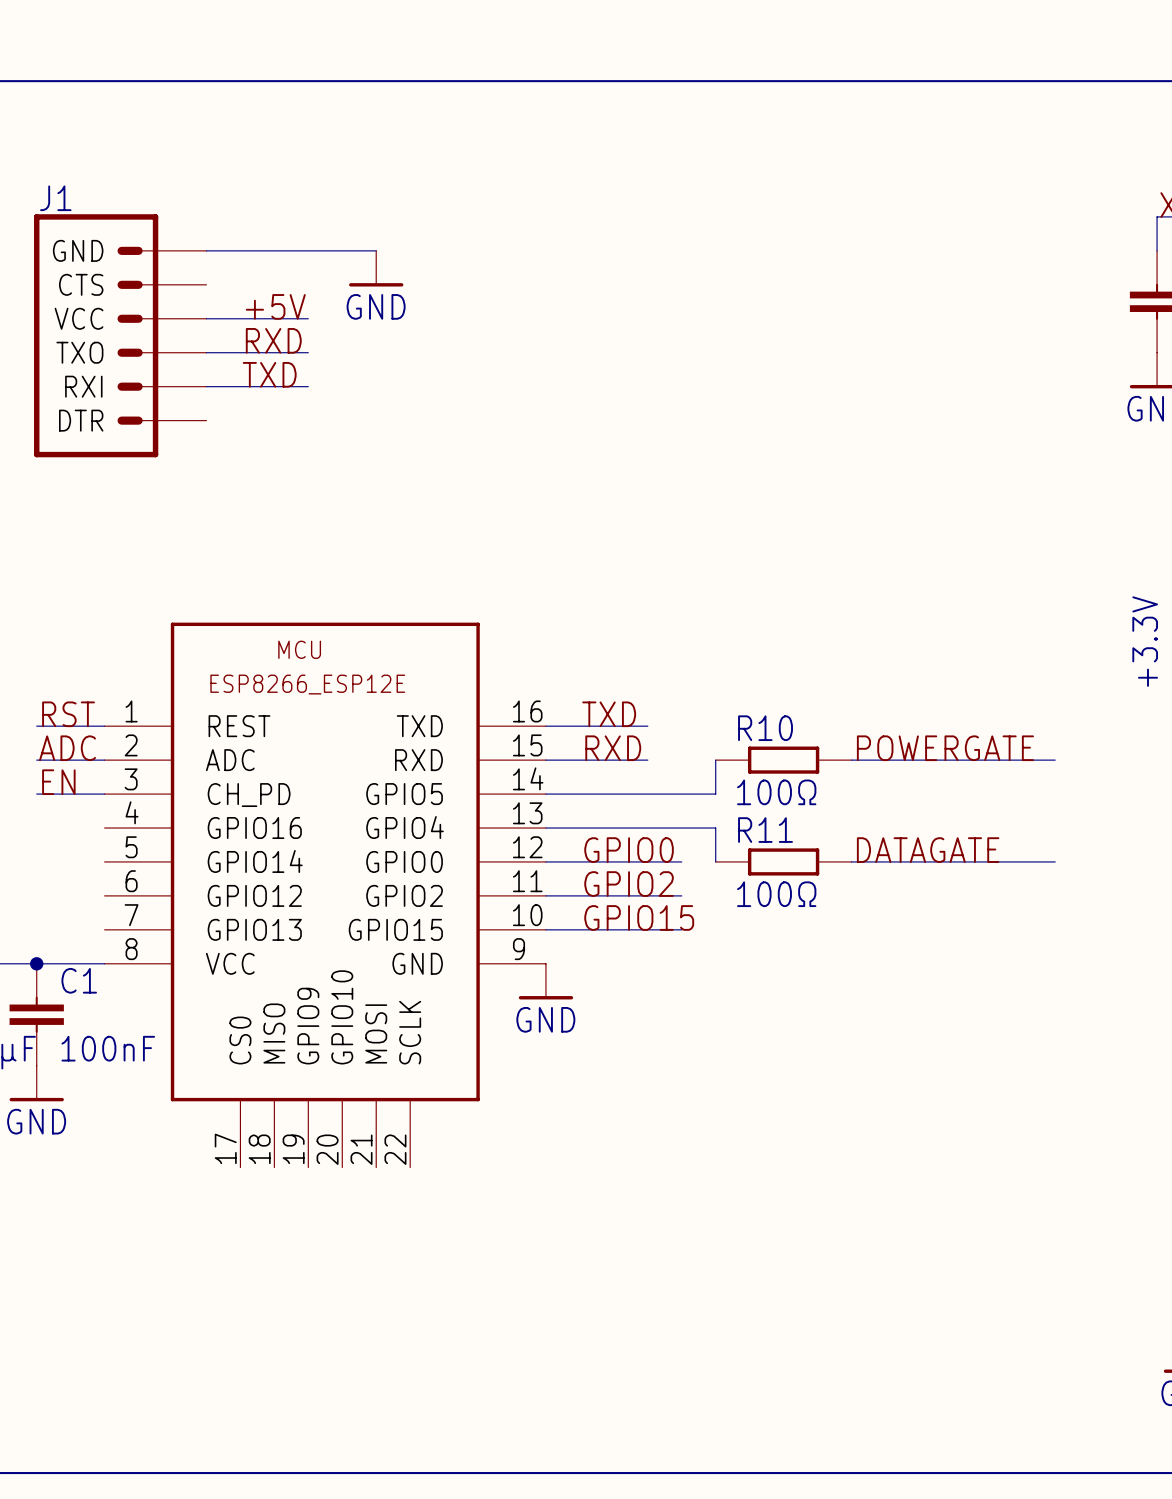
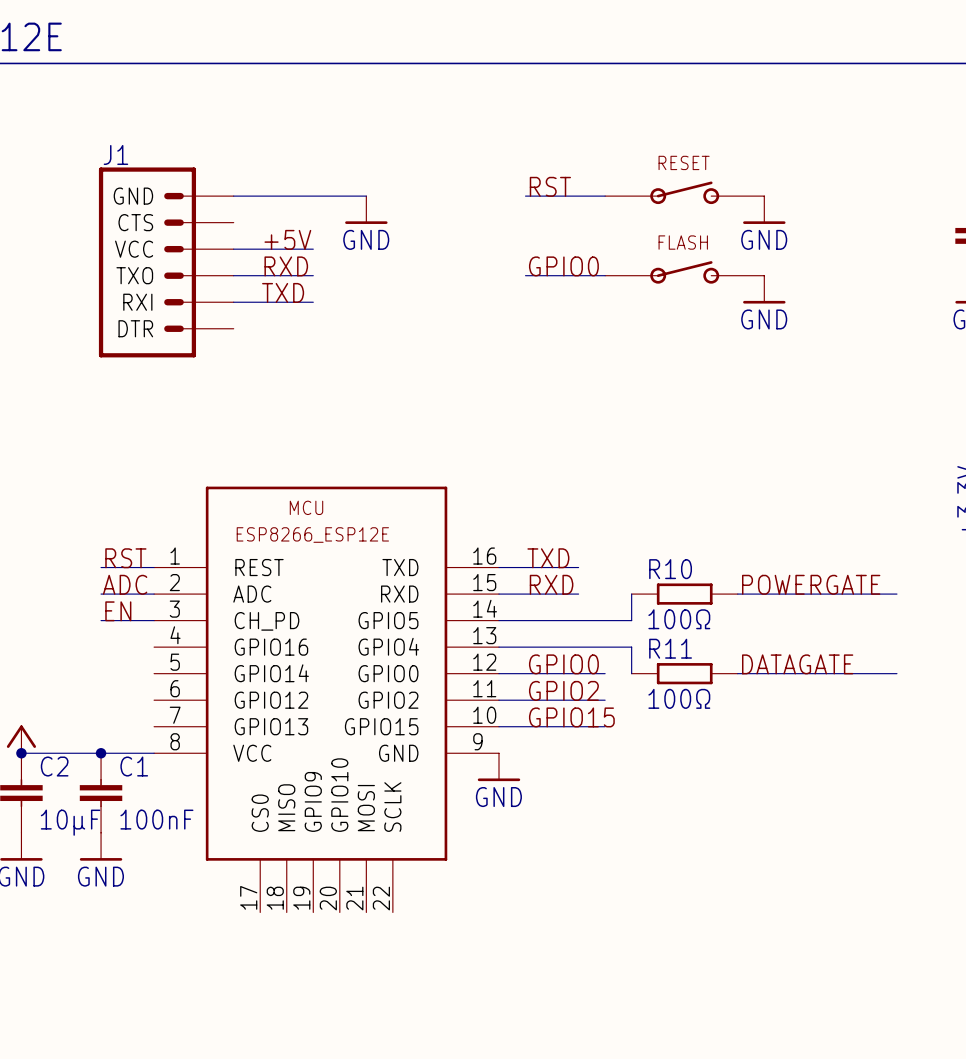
label: none -> RST (550, 186)
RESET: none -> (684, 192)
wire: none -> (525, 196) (605, 196)
power symbol: none -> GND (764, 210)
label: none -> GPIO0 (563, 266)
FLASH: none -> (684, 272)
wire: none -> (525, 275) (605, 275)
power symbol: none -> GND (764, 289)

